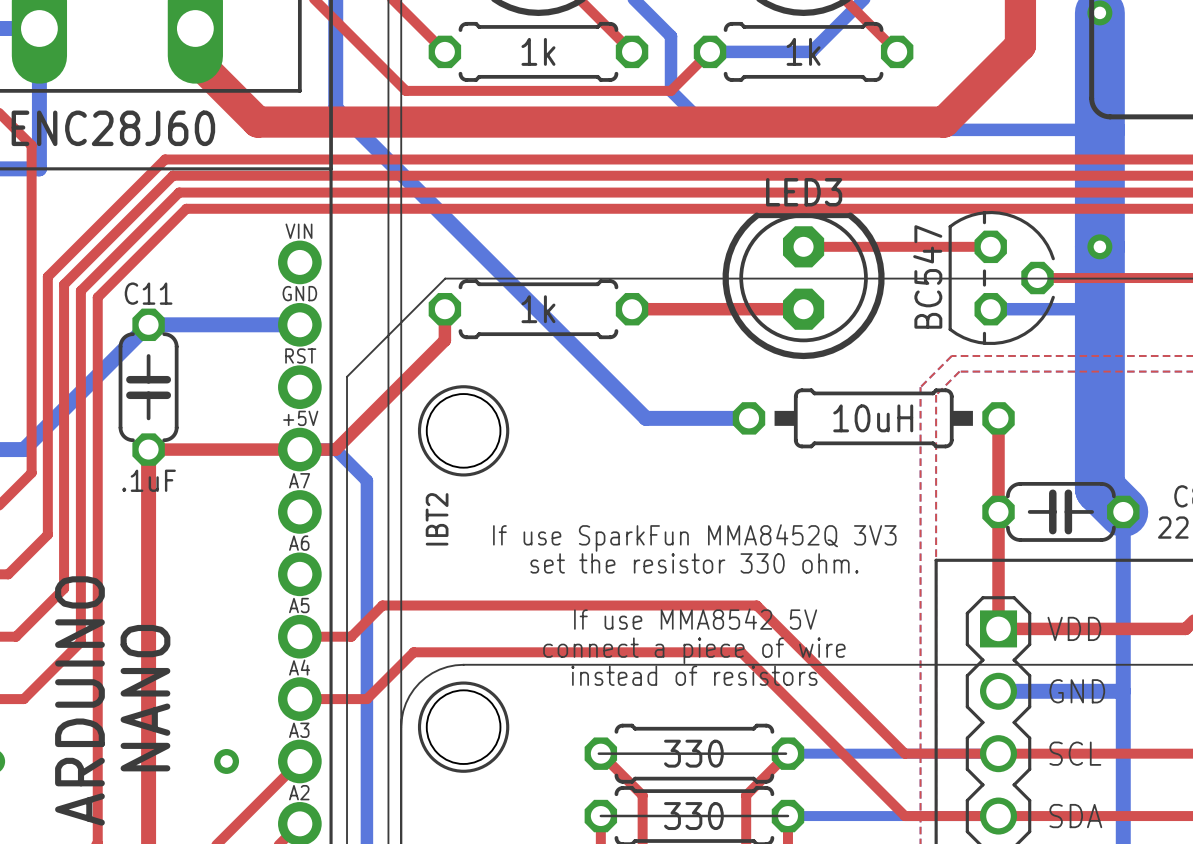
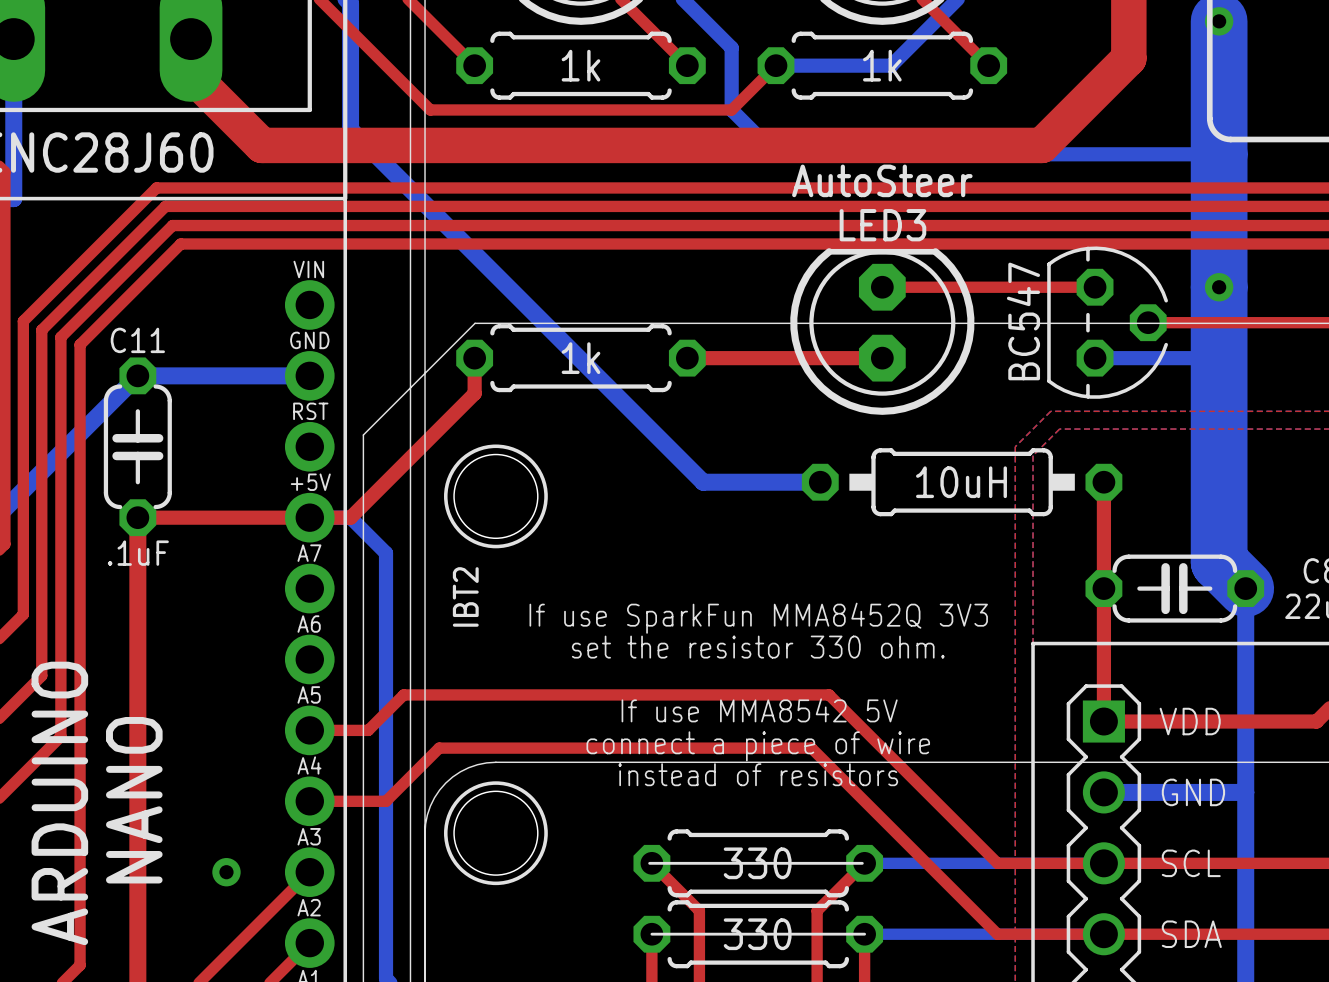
text: none -> AutoSteer (882, 180)

